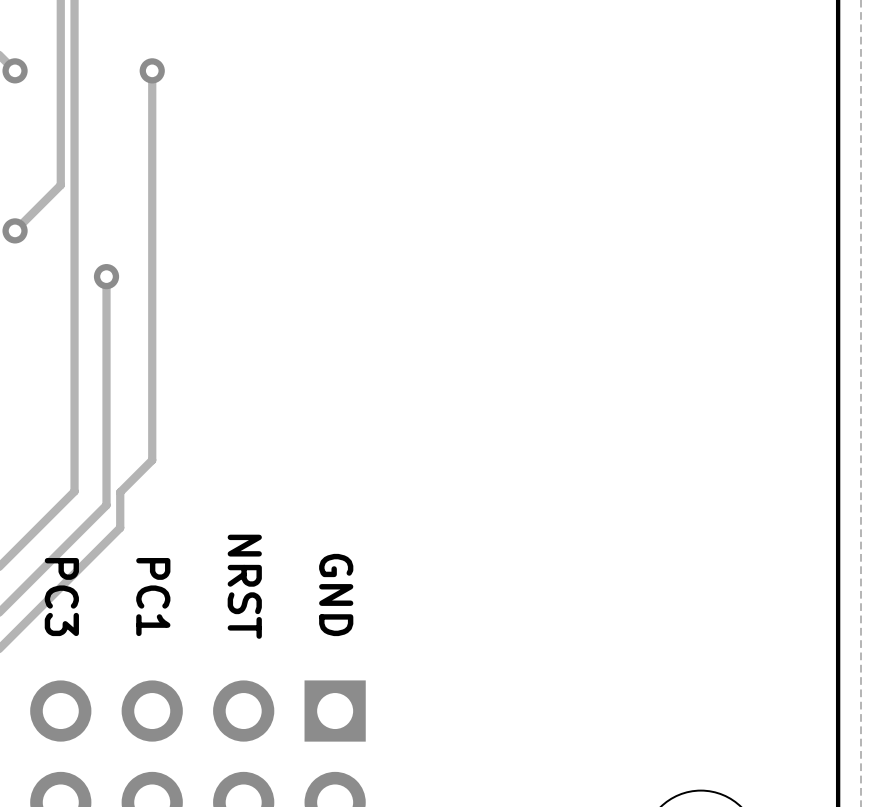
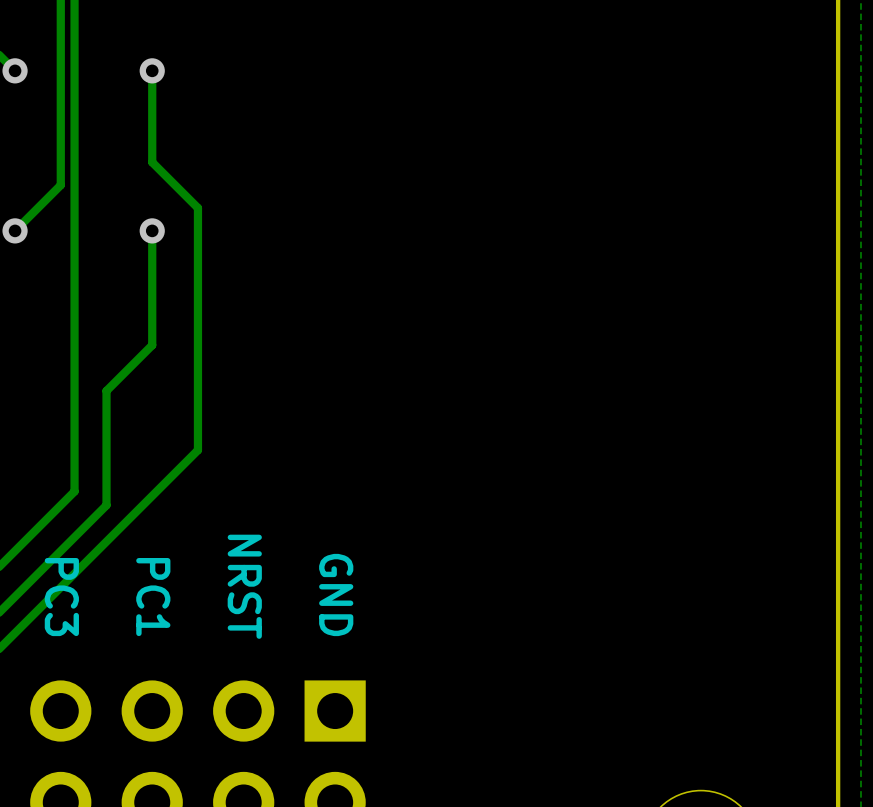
track: (152, 162) (152, 230) -> none
track: (106, 276) (106, 390) -> (152, 345) (106, 390)
via position: (106, 276) -> (152, 230)
track: (152, 345) (152, 460) (120, 492) (120, 527) -> (152, 162) (197, 208) (197, 450) (120, 527)

